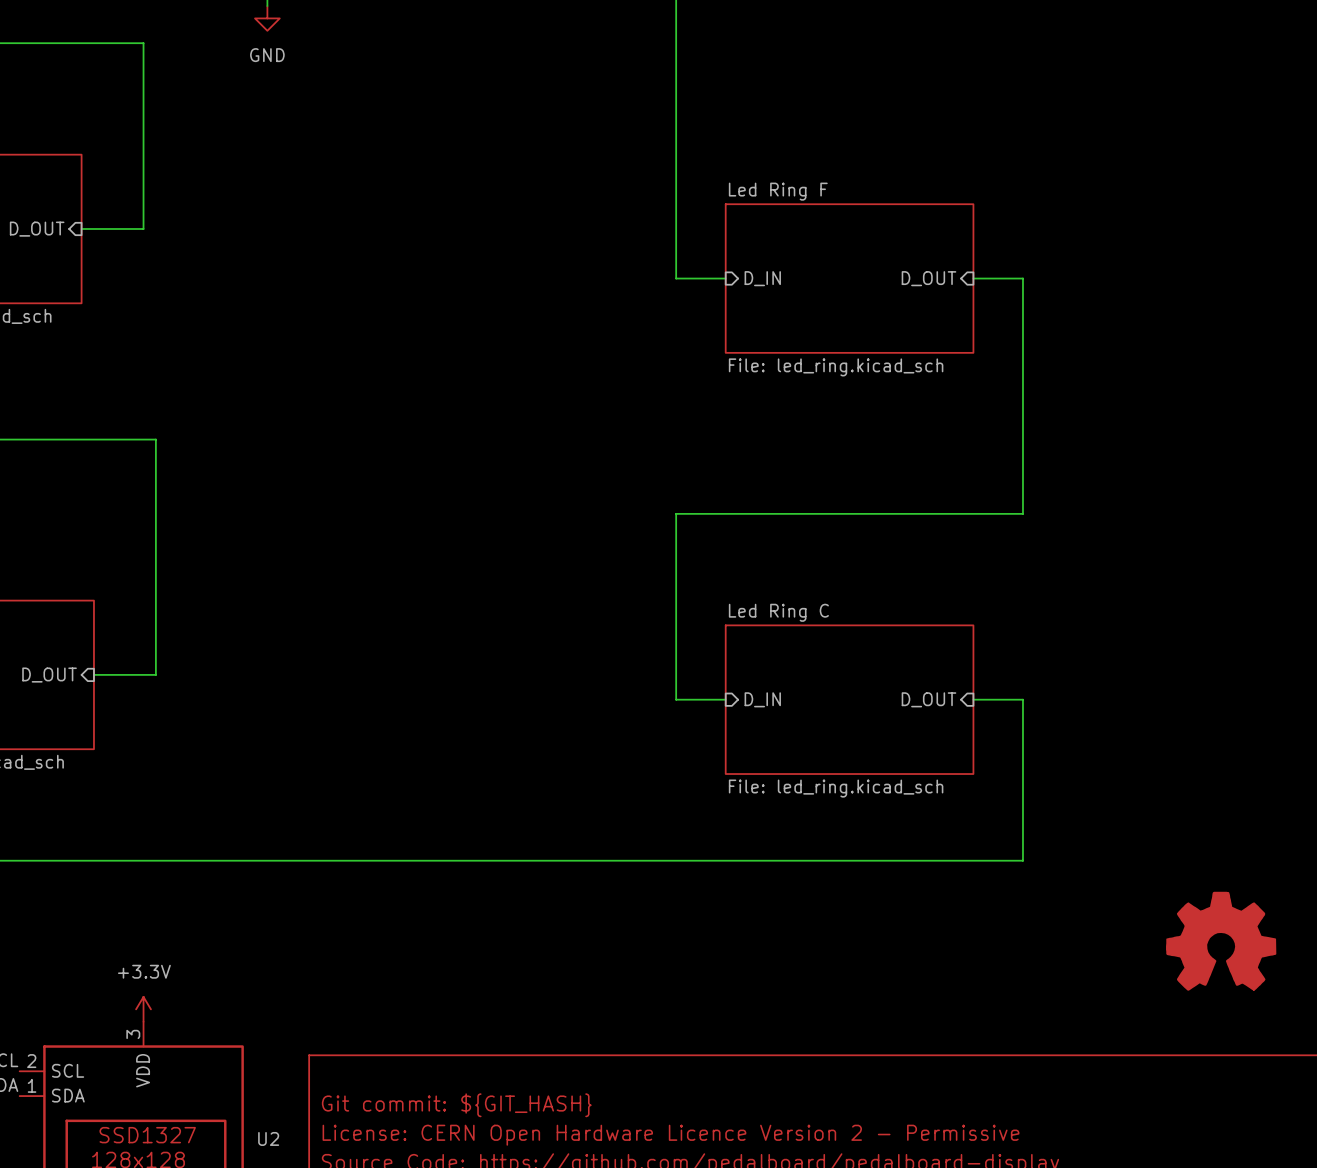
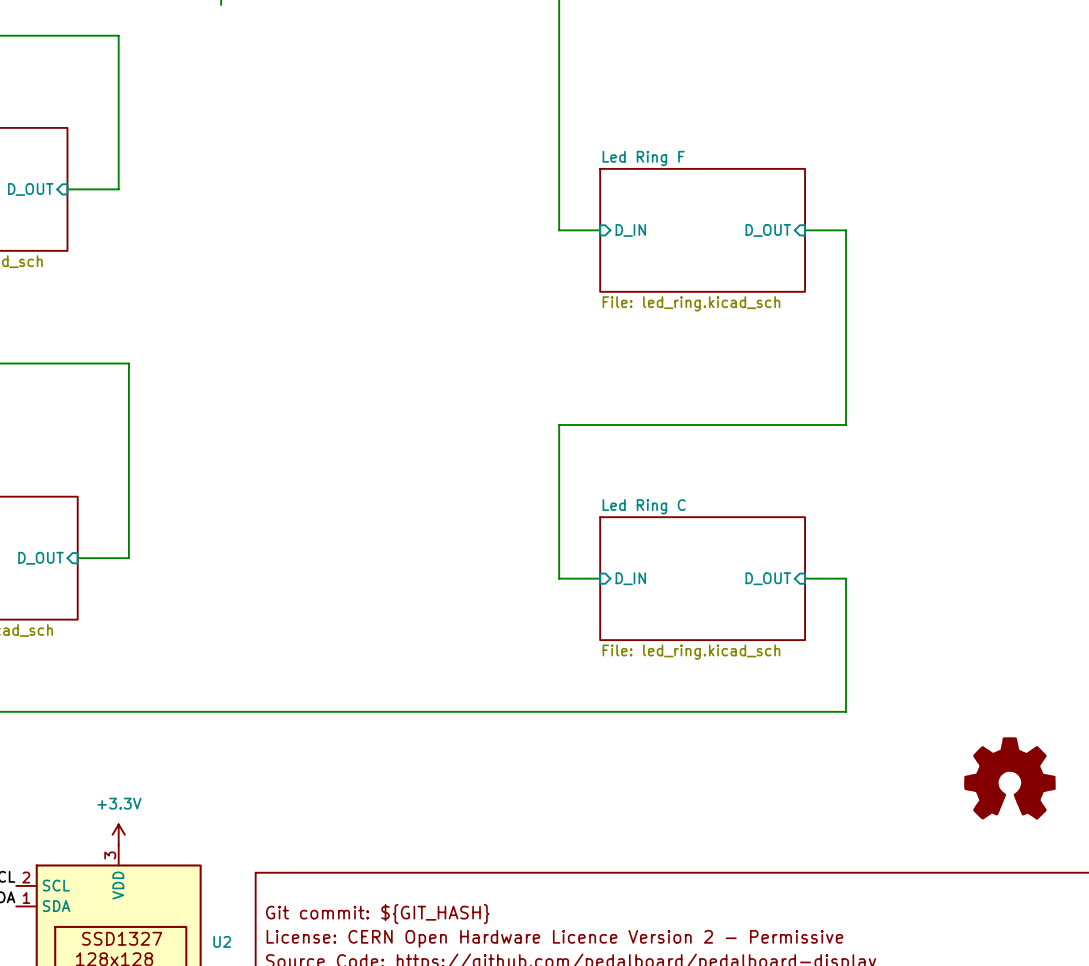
power symbol: GND (267, 18) -> none

